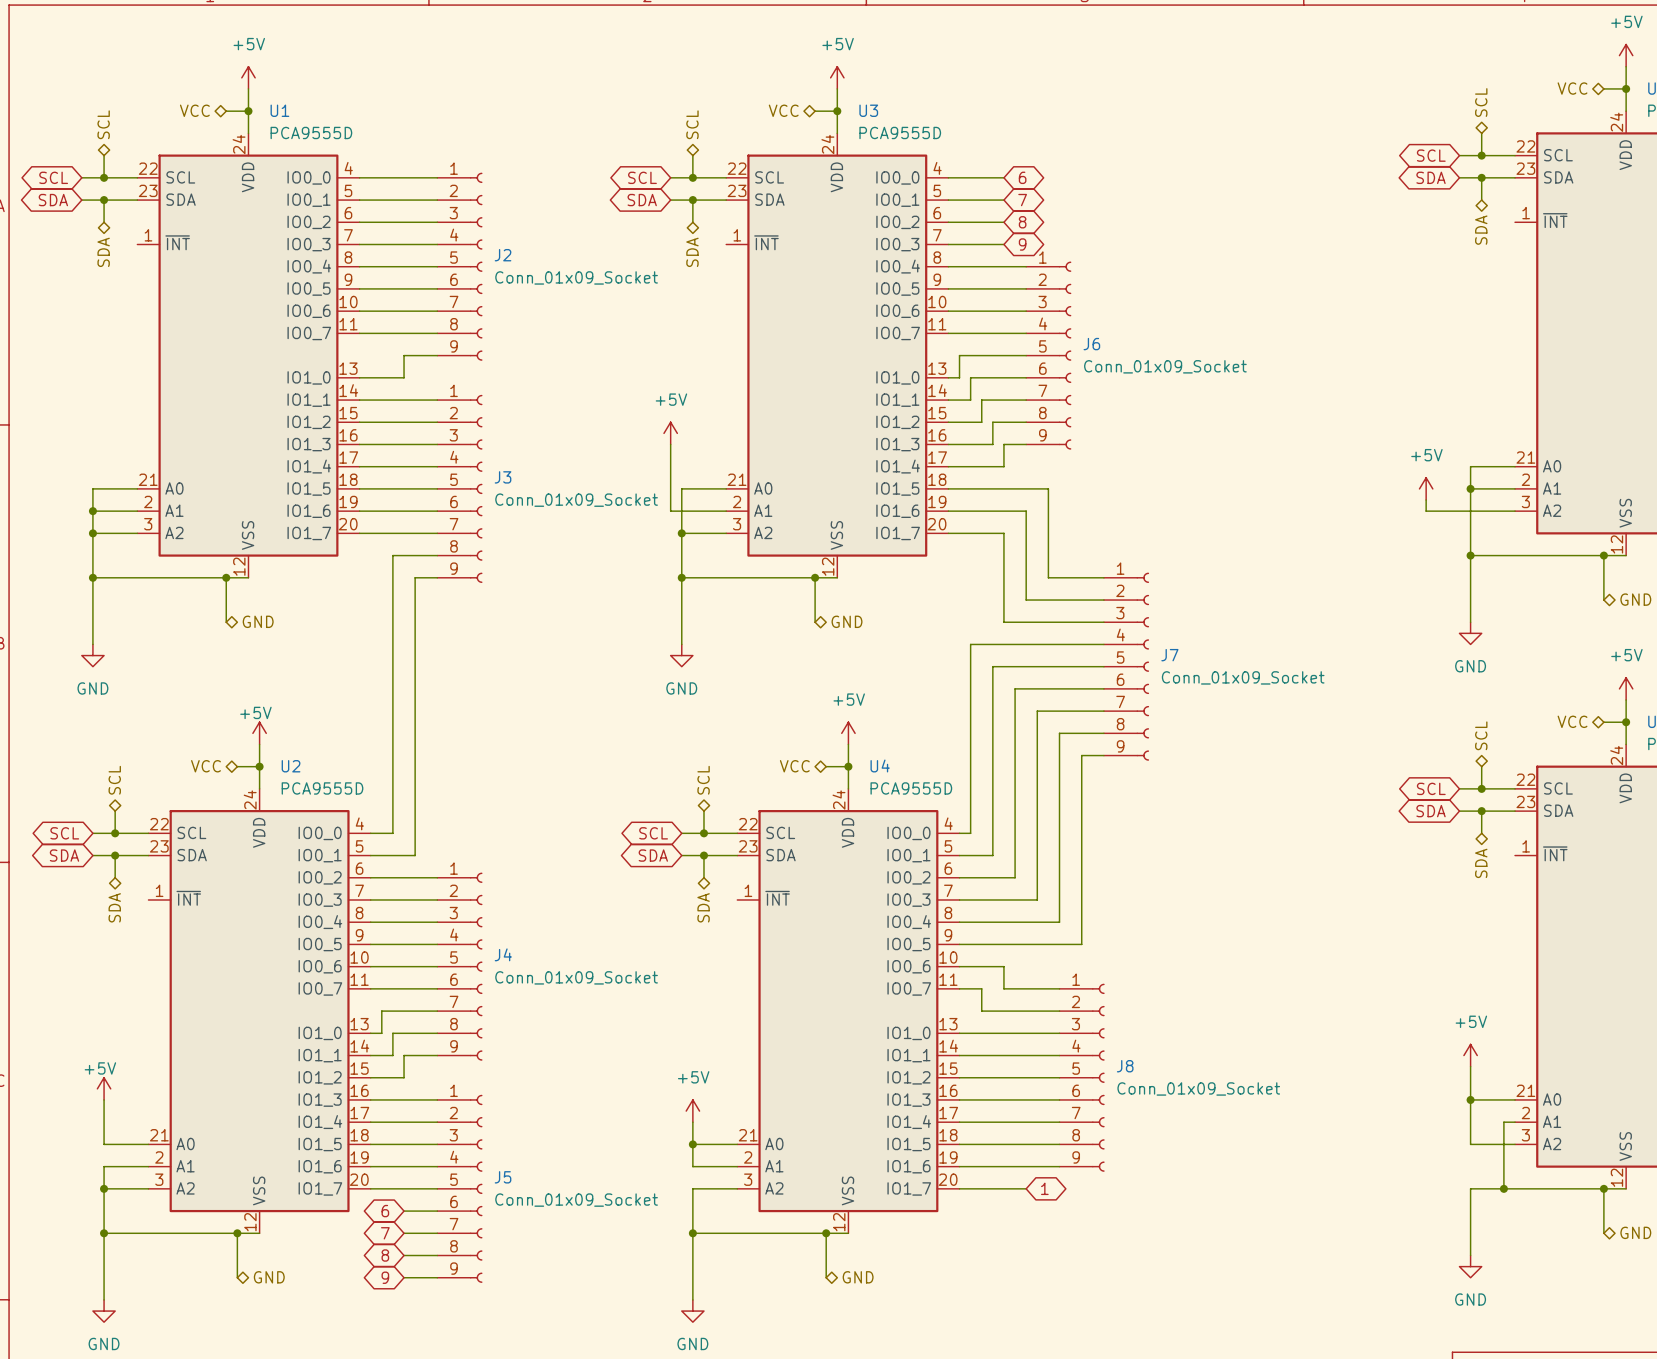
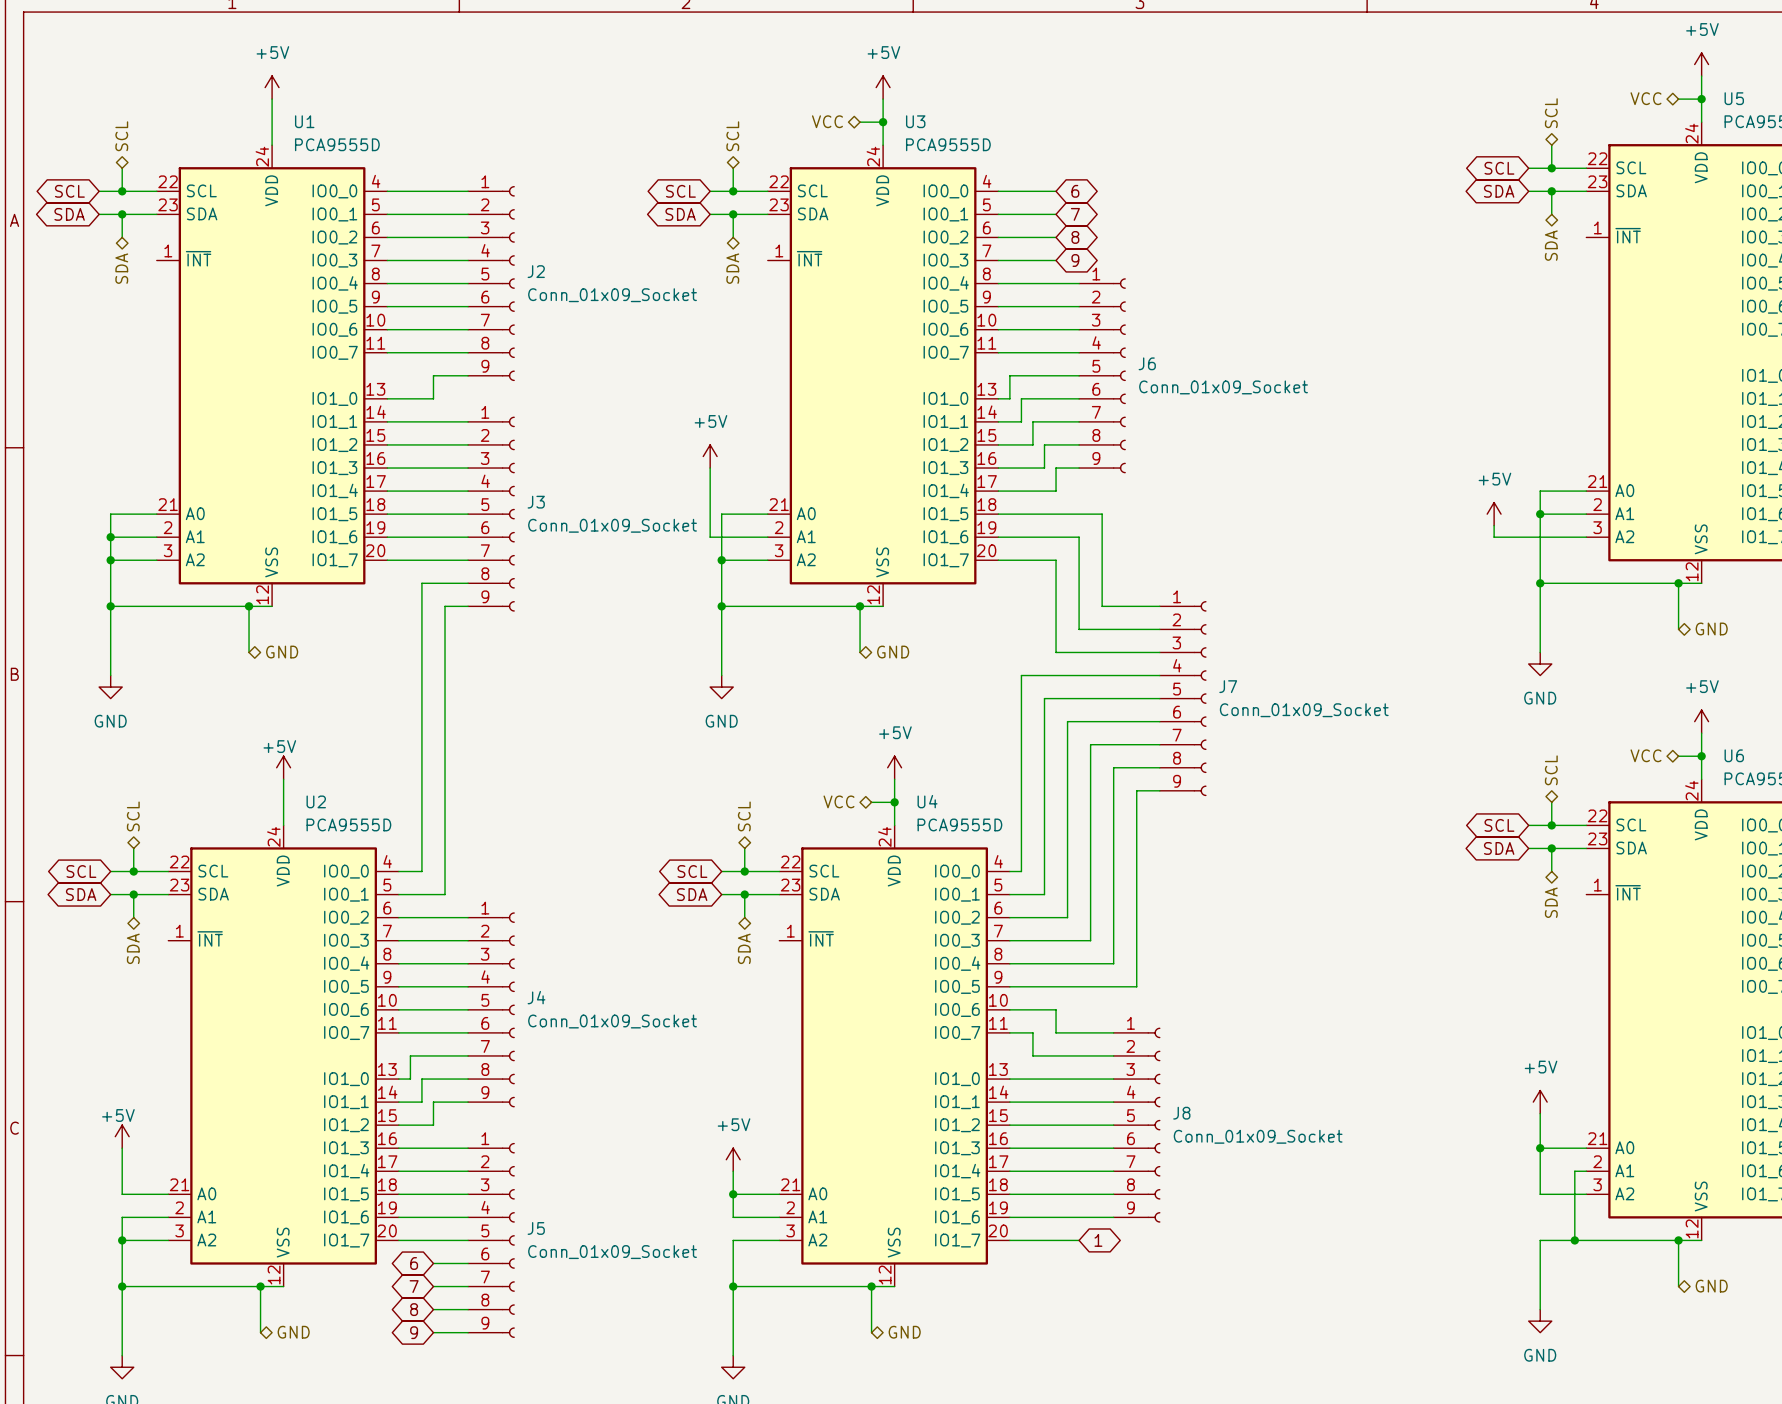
hierarchical label: VCC (194, 110) -> none
wire: (226, 111) (248, 111) -> none
junction: (248, 111) -> none
hierarchical label: VCC (205, 766) -> none
wire: (237, 766) (259, 766) -> none
junction: (259, 766) -> none

